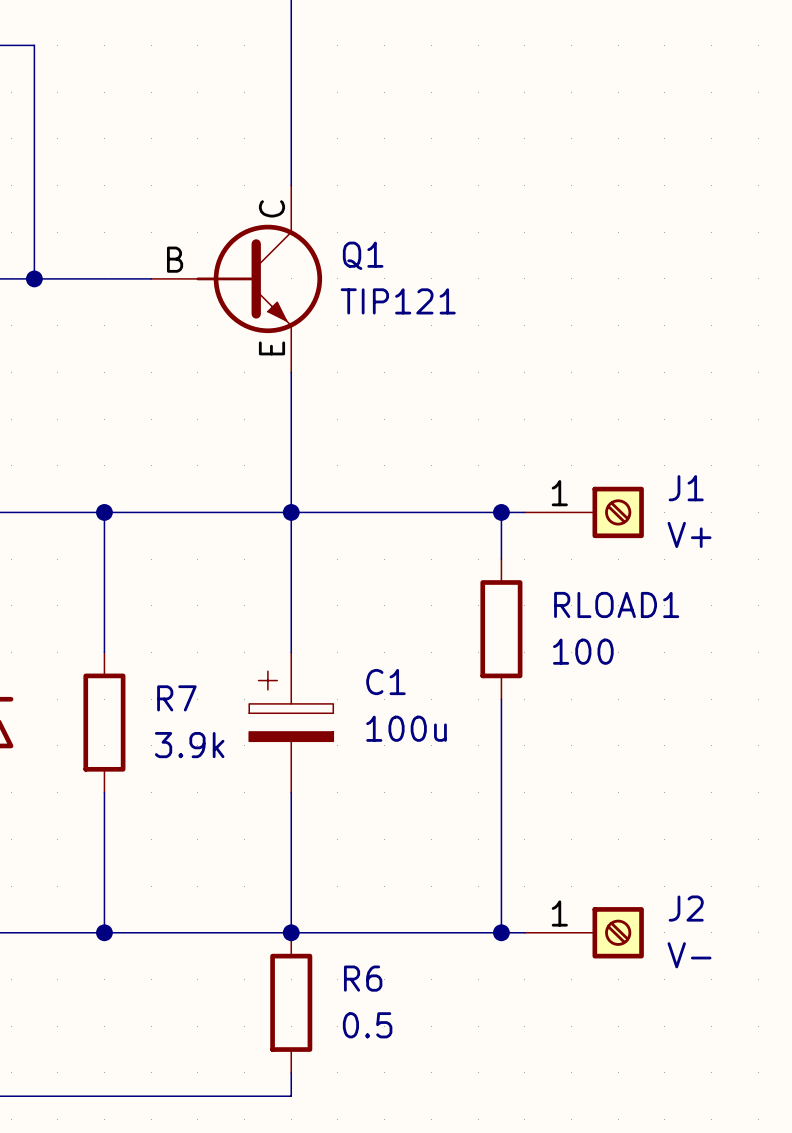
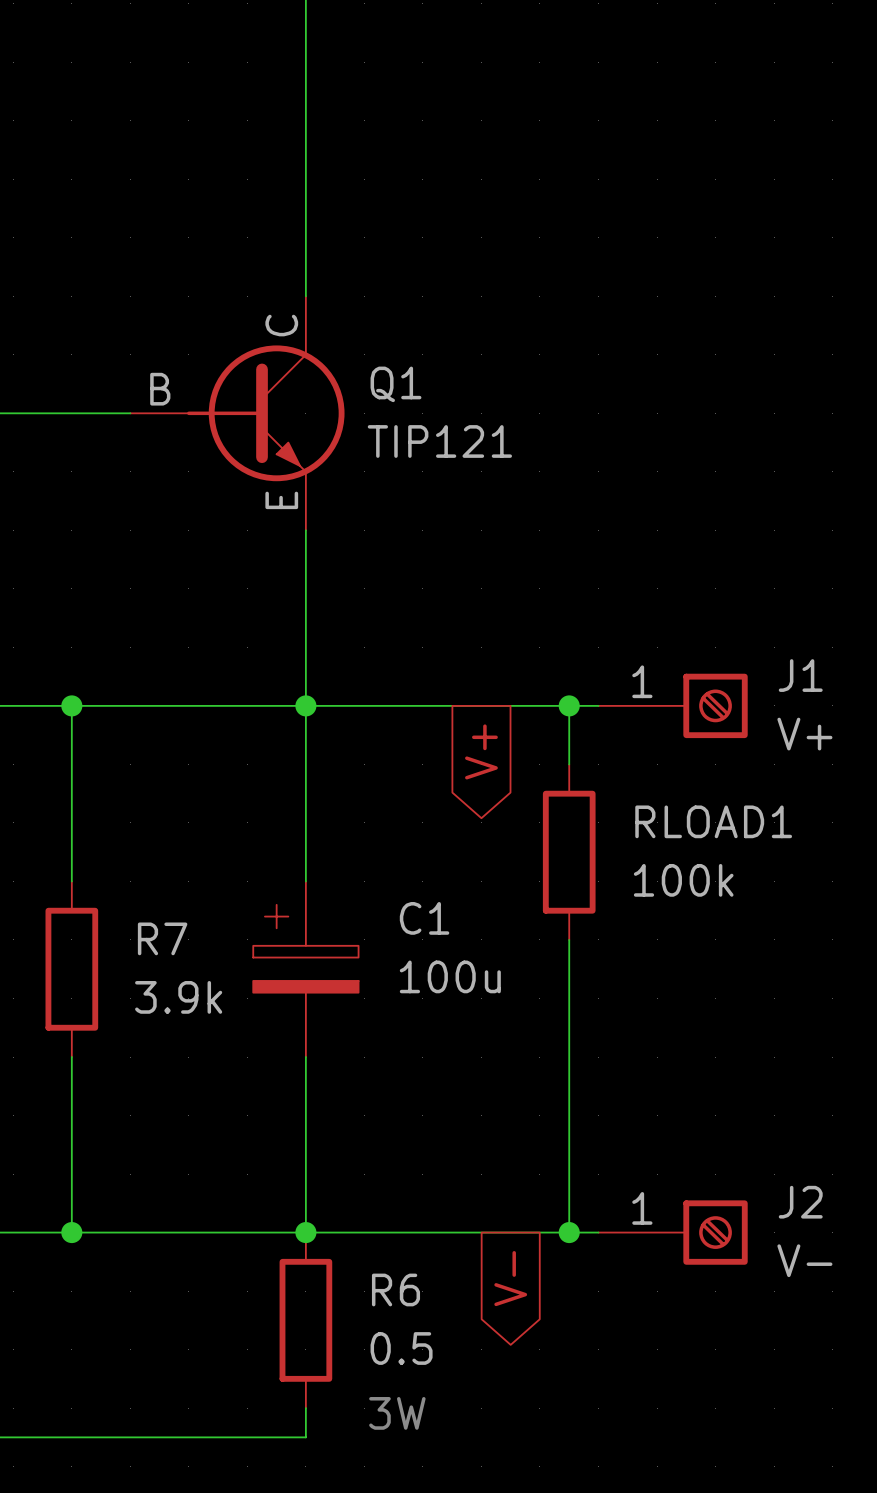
global label: none -> V+ (481, 751)
RLOAD1 value: 100 (583, 651) -> 100k (683, 880)
global label: none -> V- (510, 1278)
text: none -> 3W (397, 1413)

